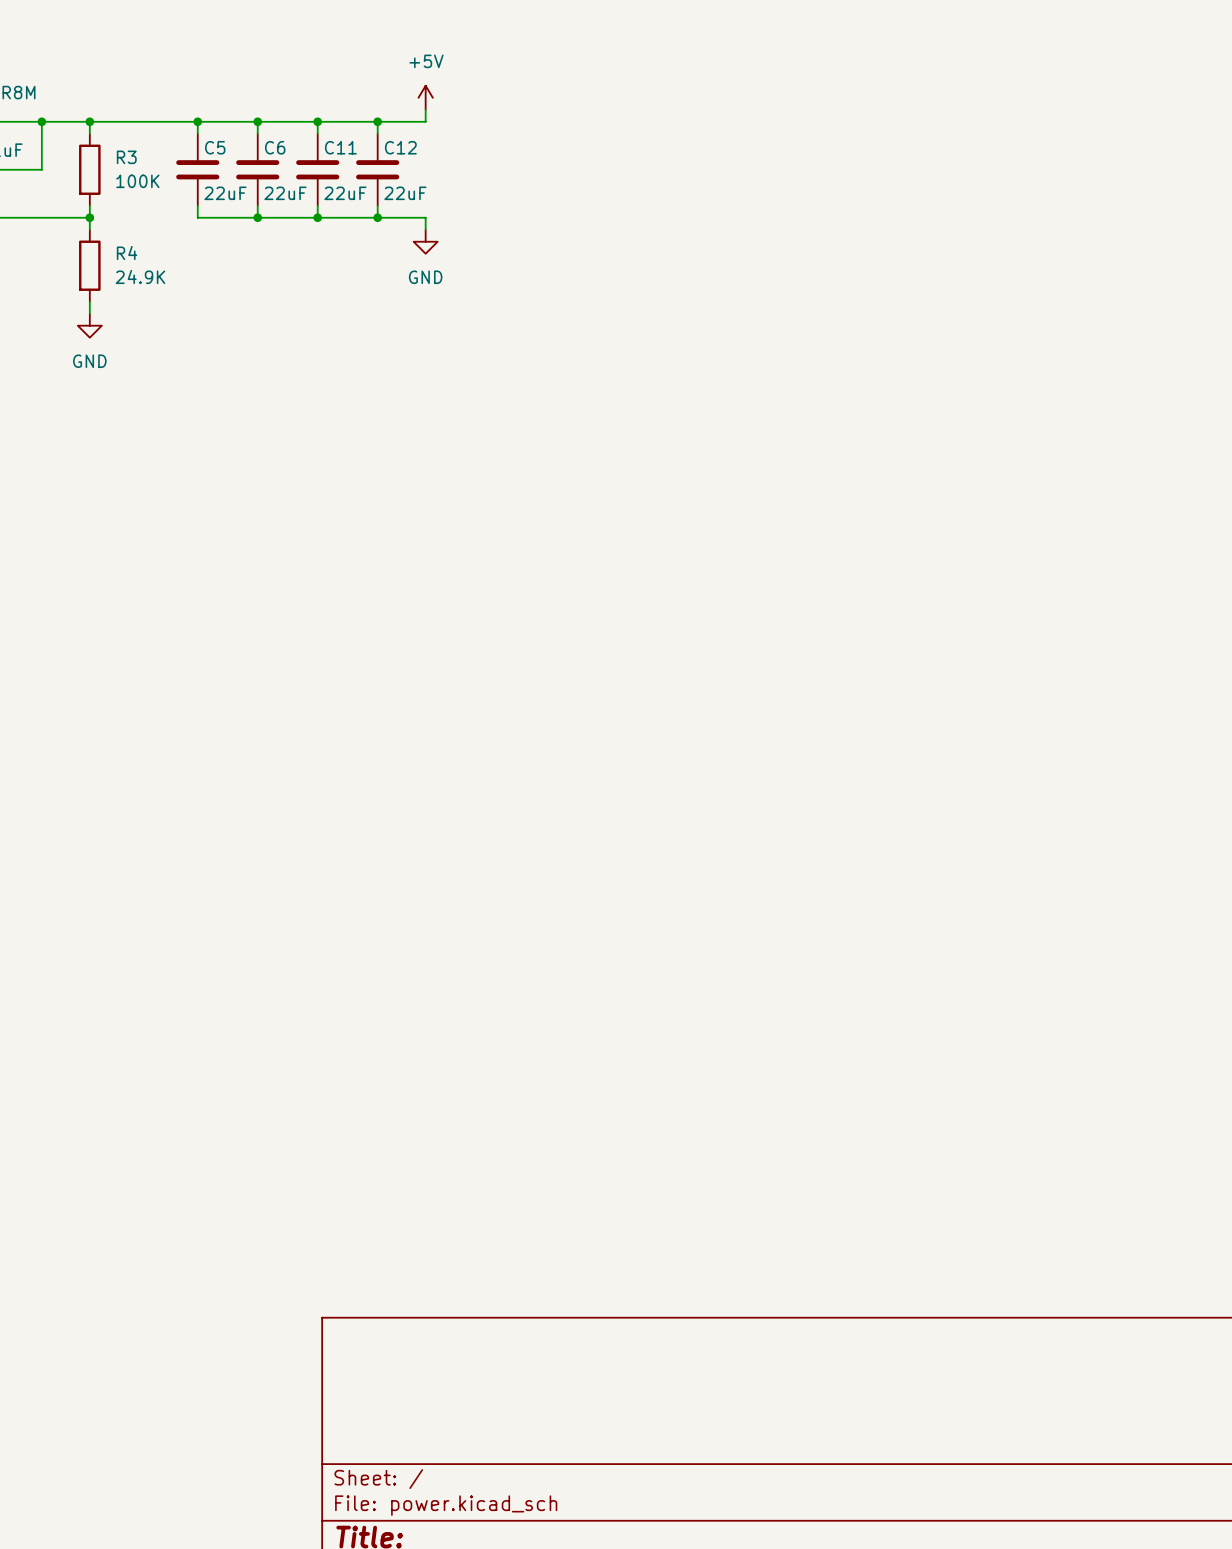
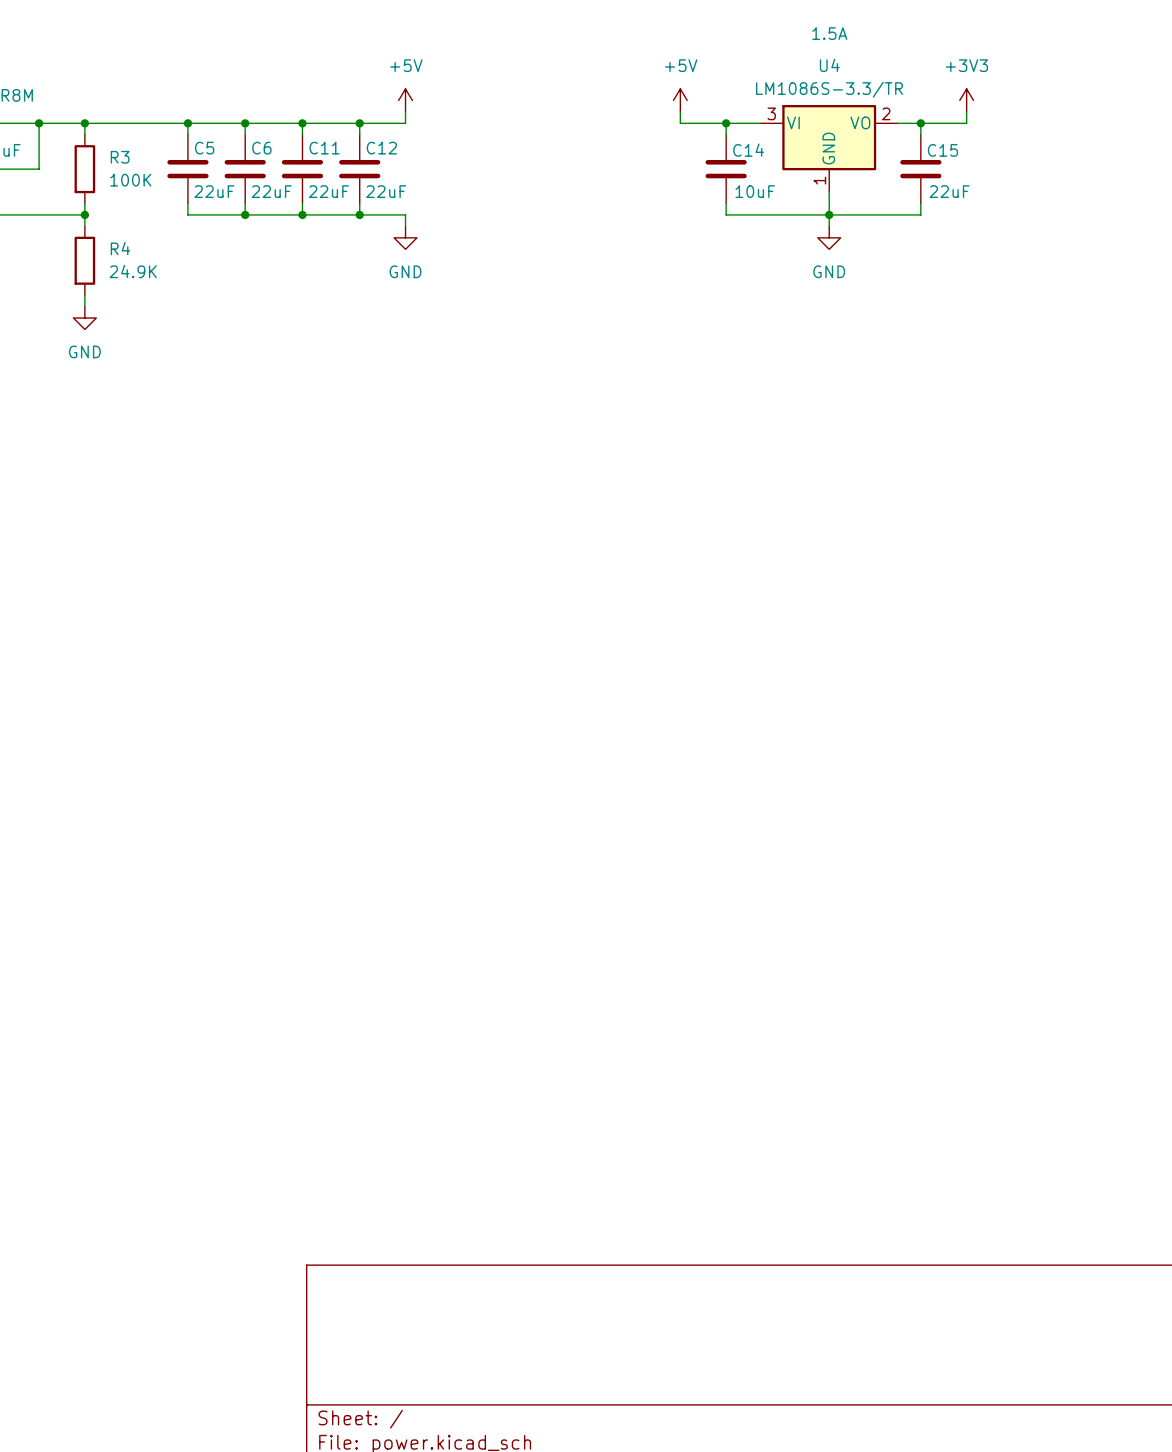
power symbol: none -> +5V (680, 100)
power symbol: none -> +3V3 (966, 100)
wire: none -> (680, 111) (680, 123) (760, 123)
wire: none -> (966, 111) (966, 123) (897, 123)
wire: none -> (726, 123) (726, 134)
junction: none -> (726, 123)
wire: none -> (920, 123) (920, 134)
junction: none -> (920, 123)
U4: none -> LM1086S-3.3/TR (829, 148)
C14: none -> 10uF (726, 169)
C15: none -> 22uF (920, 169)
wire: none -> (829, 192) (829, 226)
wire: none -> (726, 203) (726, 214) (920, 214) (920, 203)
junction: none -> (829, 214)
power symbol: none -> GND (829, 237)

